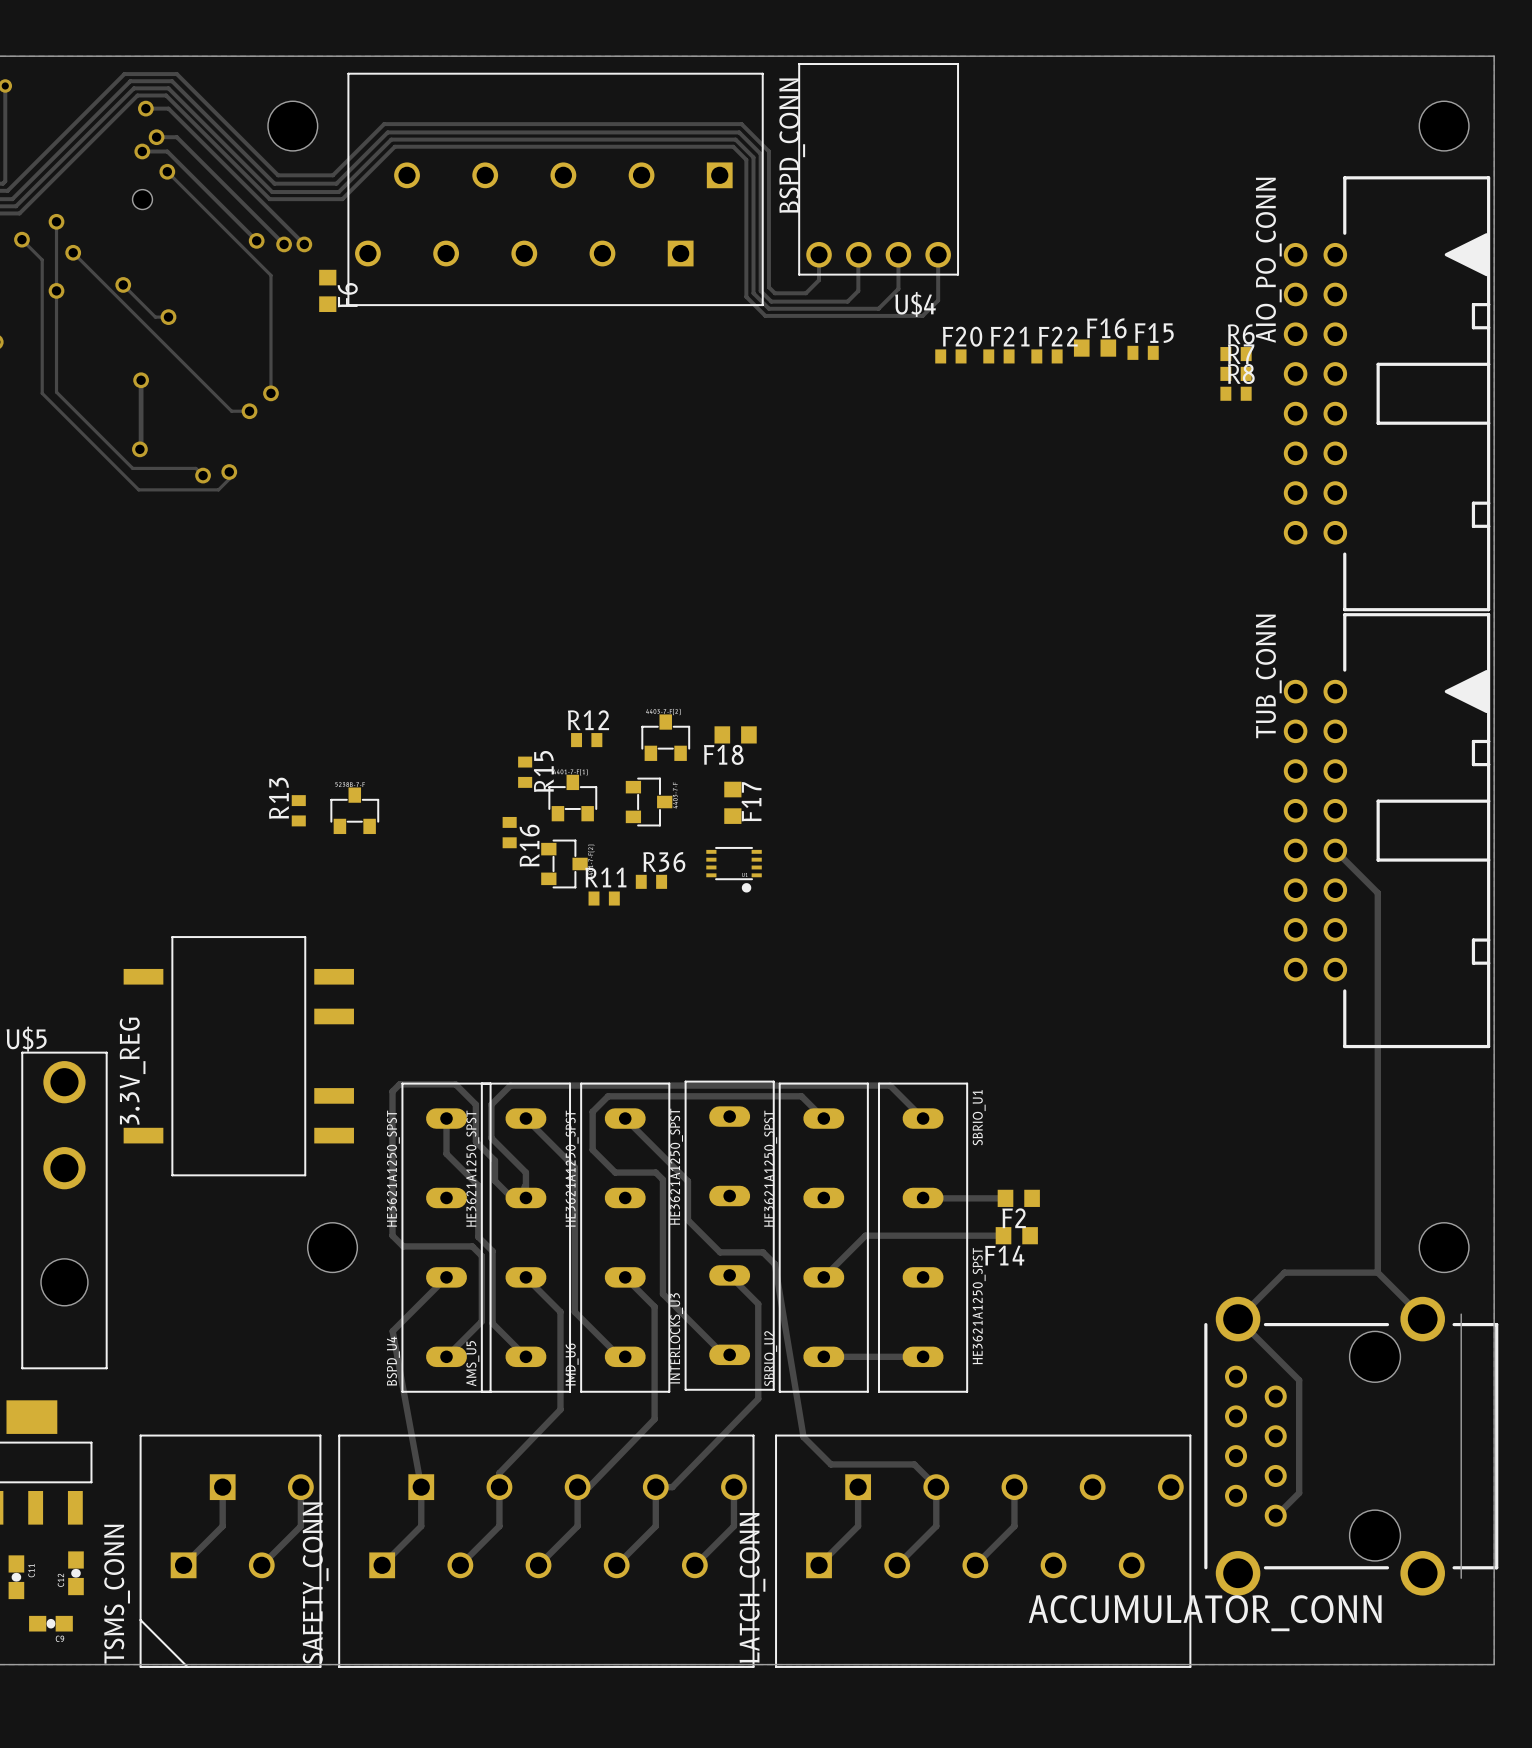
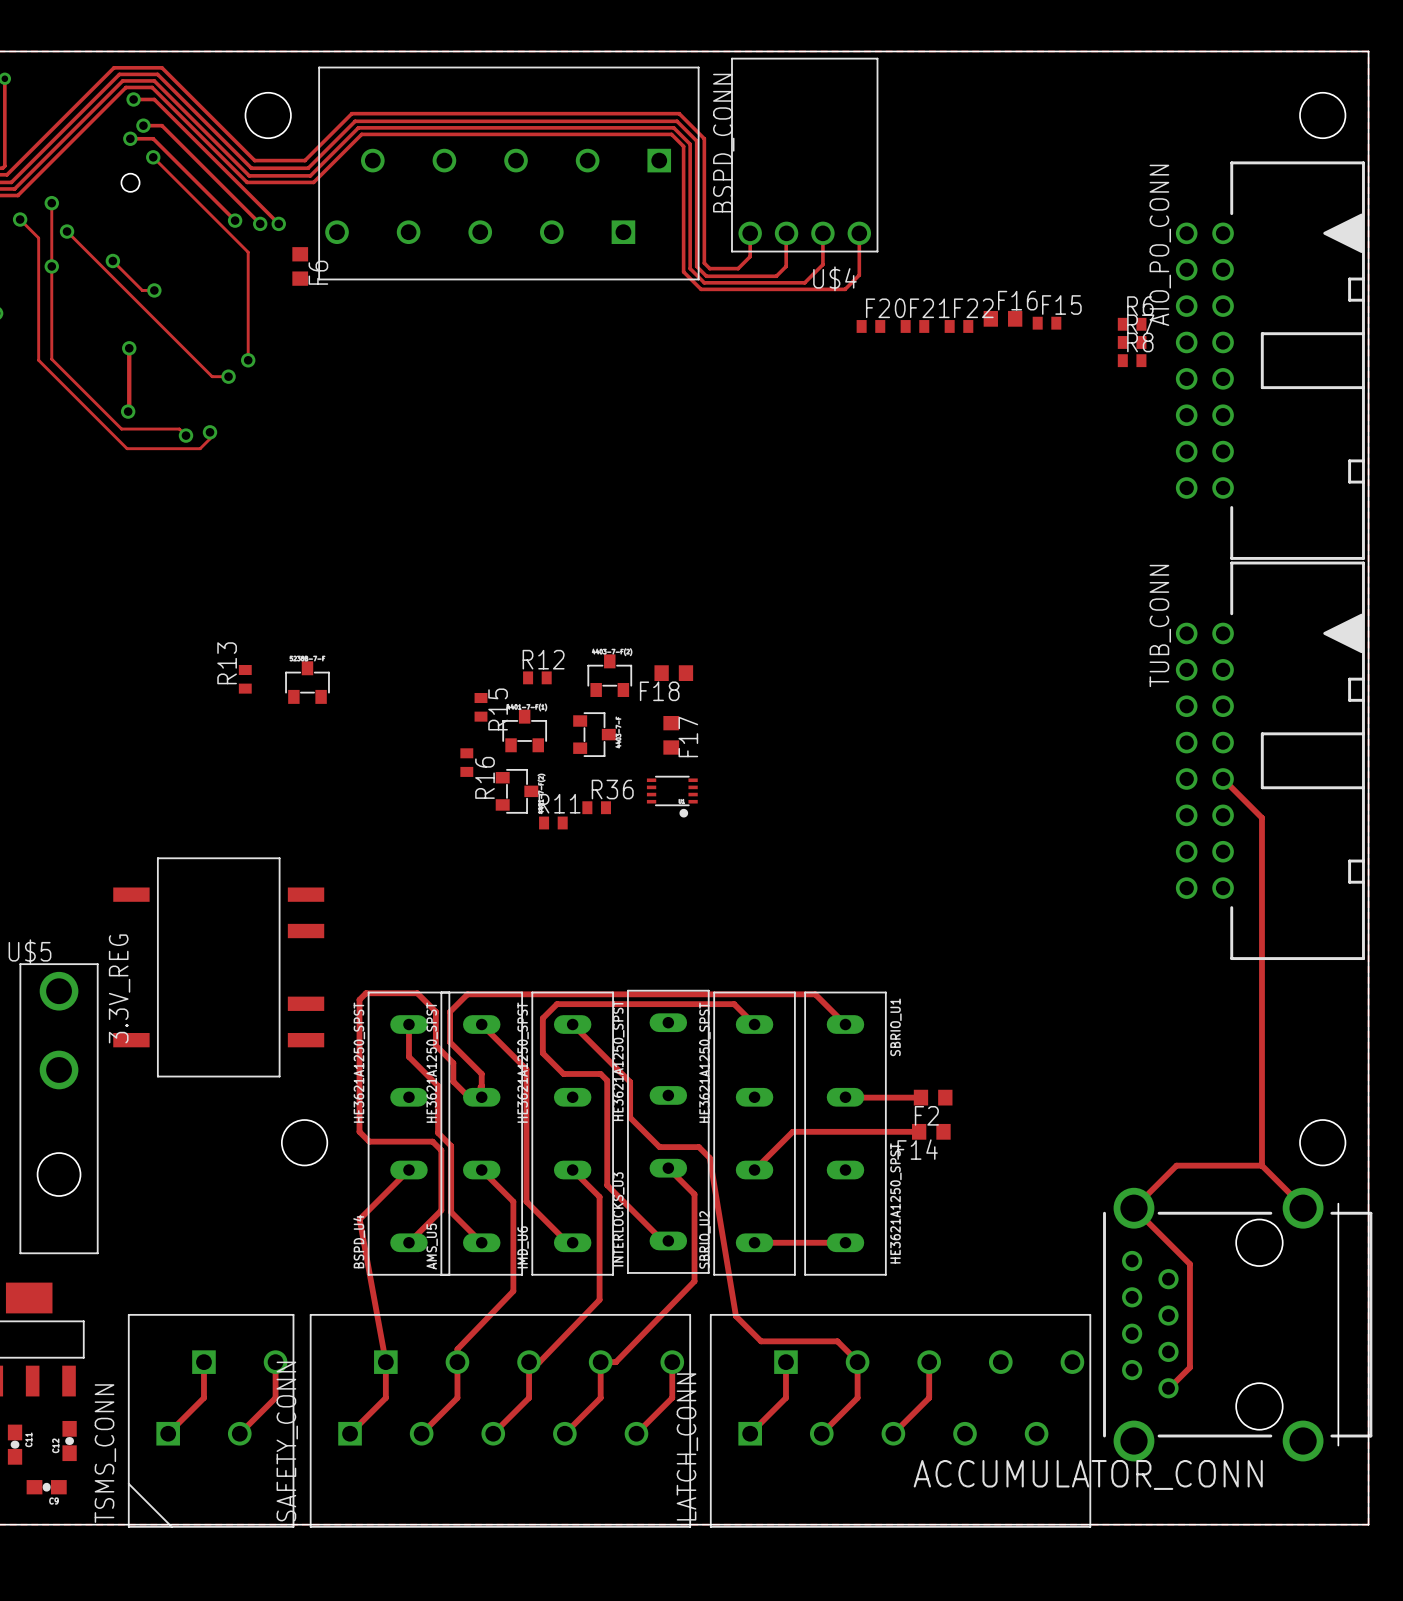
R13 position: (298, 810) -> (245, 679)
part position: (354, 810) -> (307, 682)

